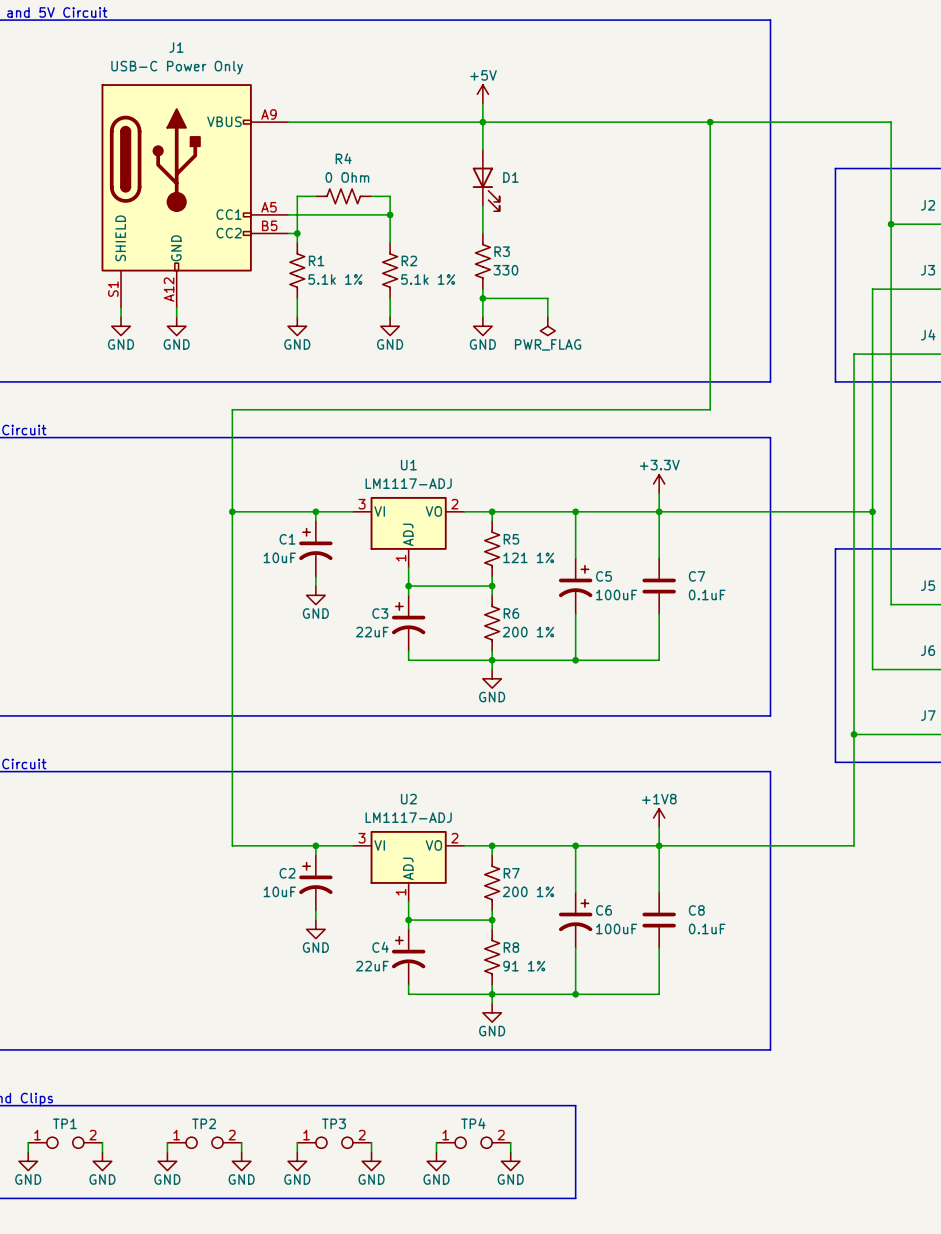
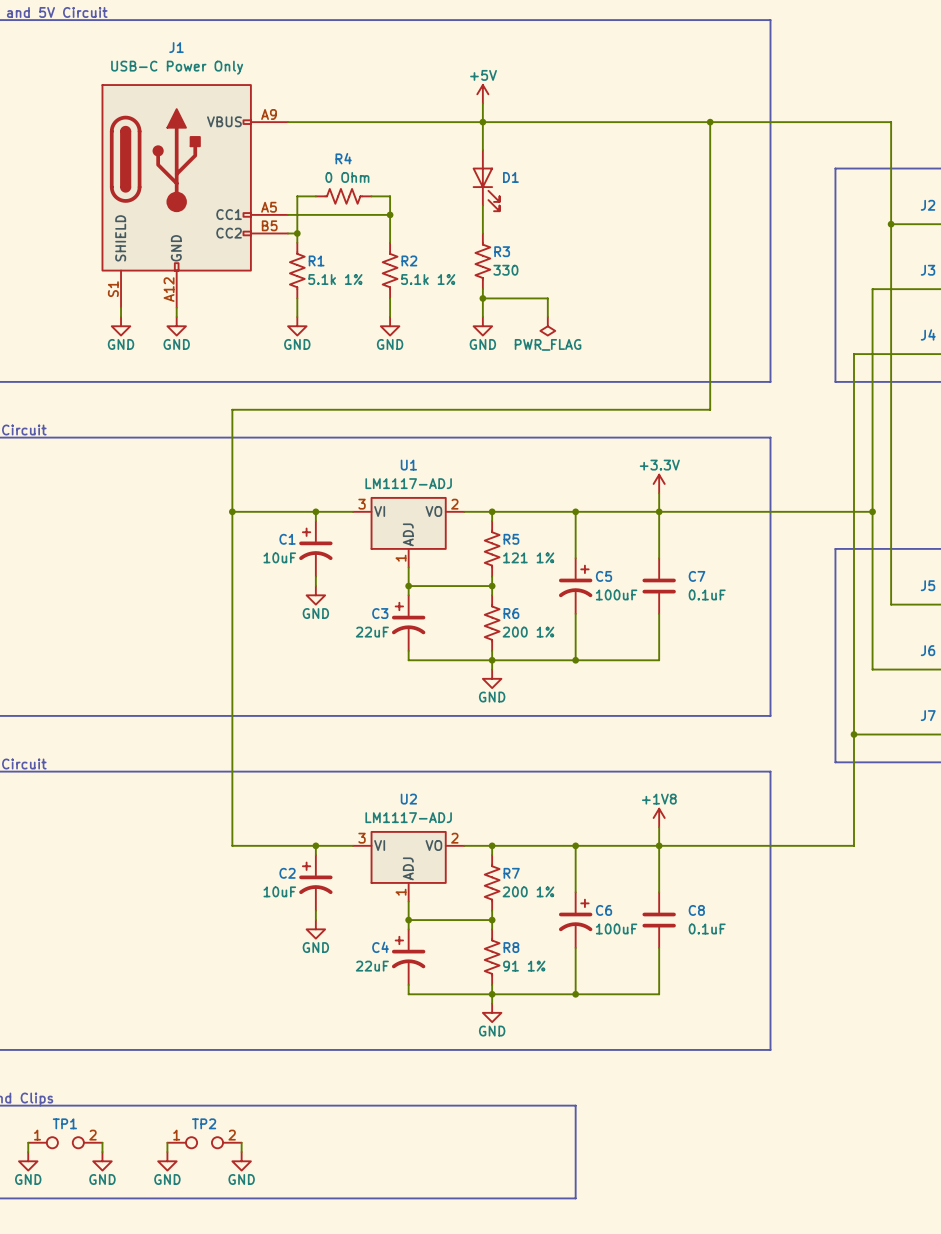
wire: (297, 1142) (297, 1152) -> none
TP3: (334, 1142) -> none
wire: (371, 1142) (371, 1152) -> none
wire: (436, 1142) (436, 1152) -> none
TP4: (473, 1142) -> none
wire: (510, 1142) (510, 1152) -> none
power symbol: GND (297, 1161) -> none
power symbol: GND (371, 1161) -> none
power symbol: GND (436, 1161) -> none
power symbol: GND (510, 1161) -> none

